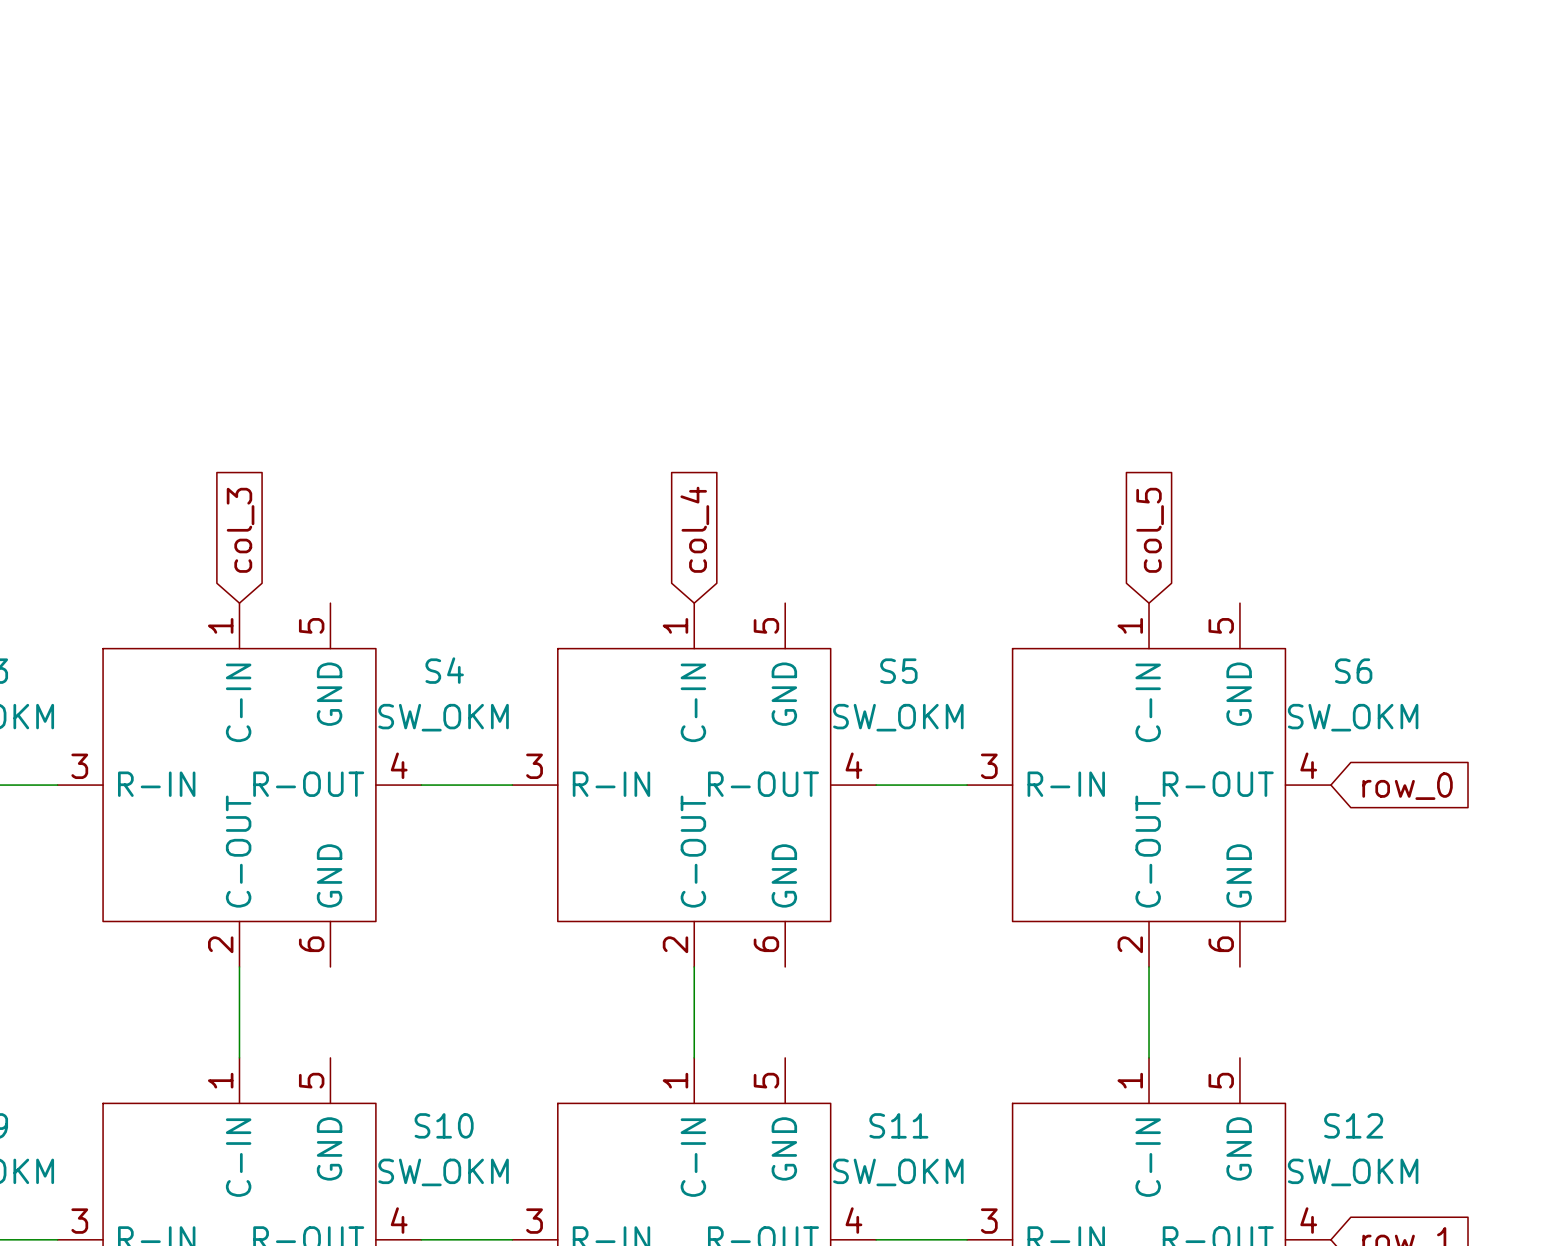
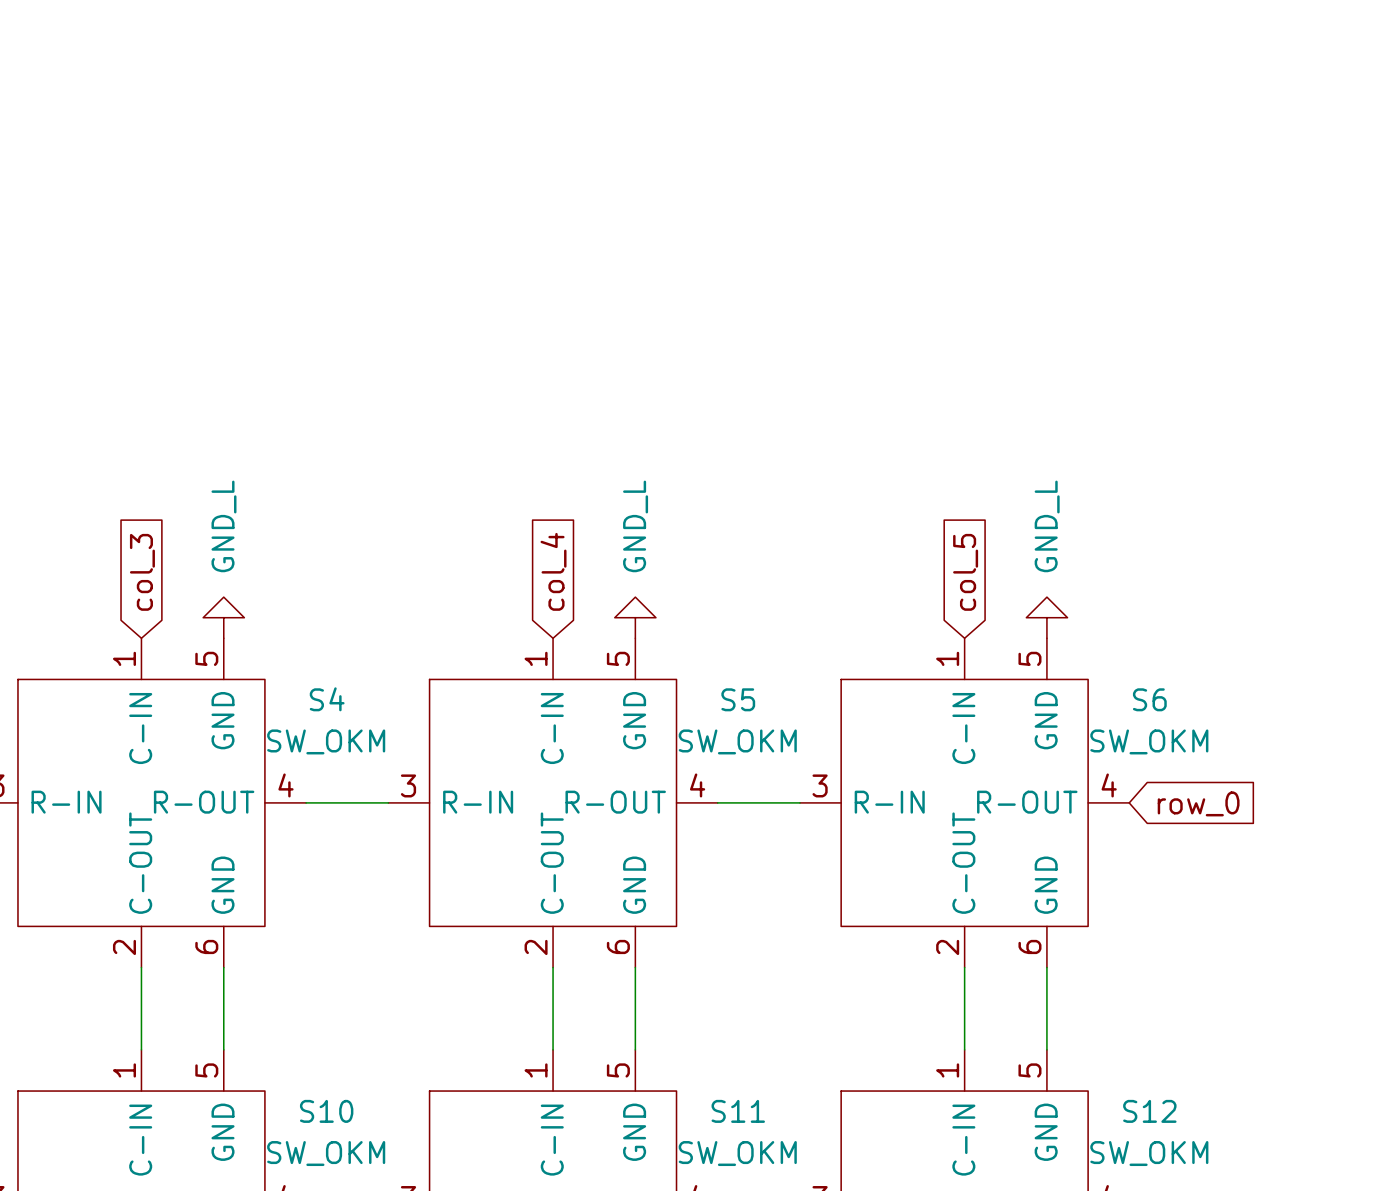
power symbol: none -> GND_L (223, 617)
power symbol: none -> GND_L (635, 617)
power symbol: none -> GND_L (1046, 617)
wire: none -> (223, 967) (223, 1049)
wire: none -> (635, 967) (635, 1049)
wire: none -> (1046, 967) (1046, 1049)

